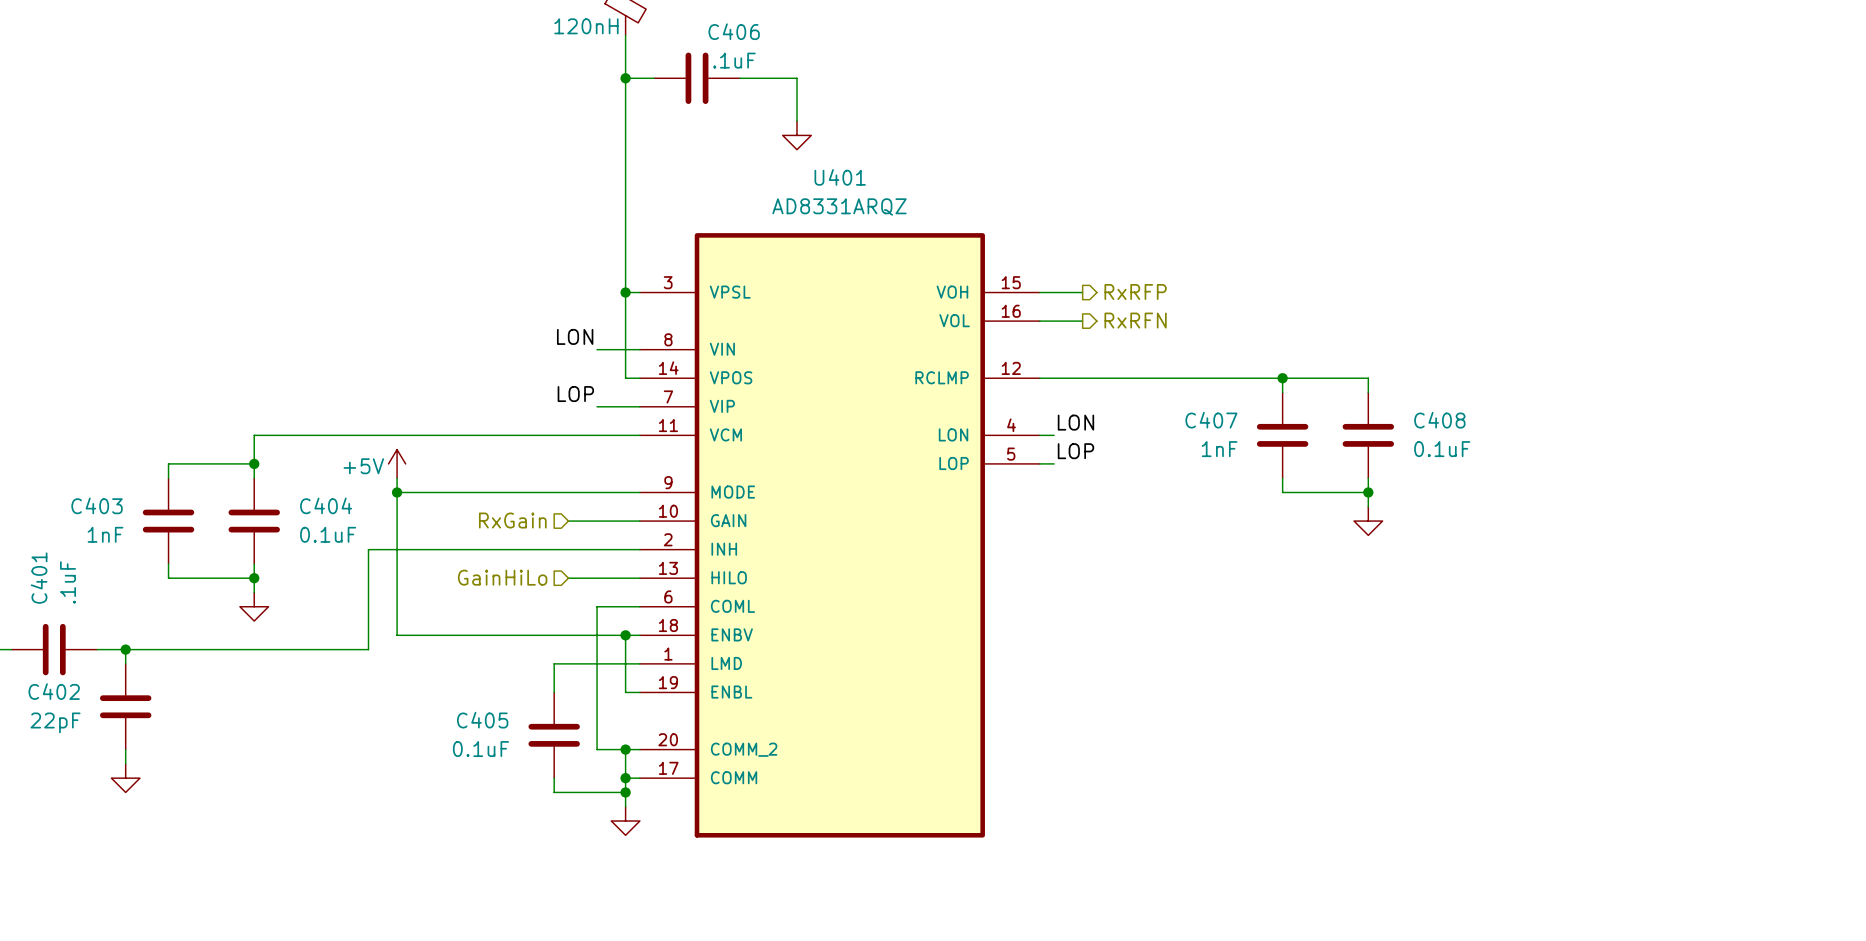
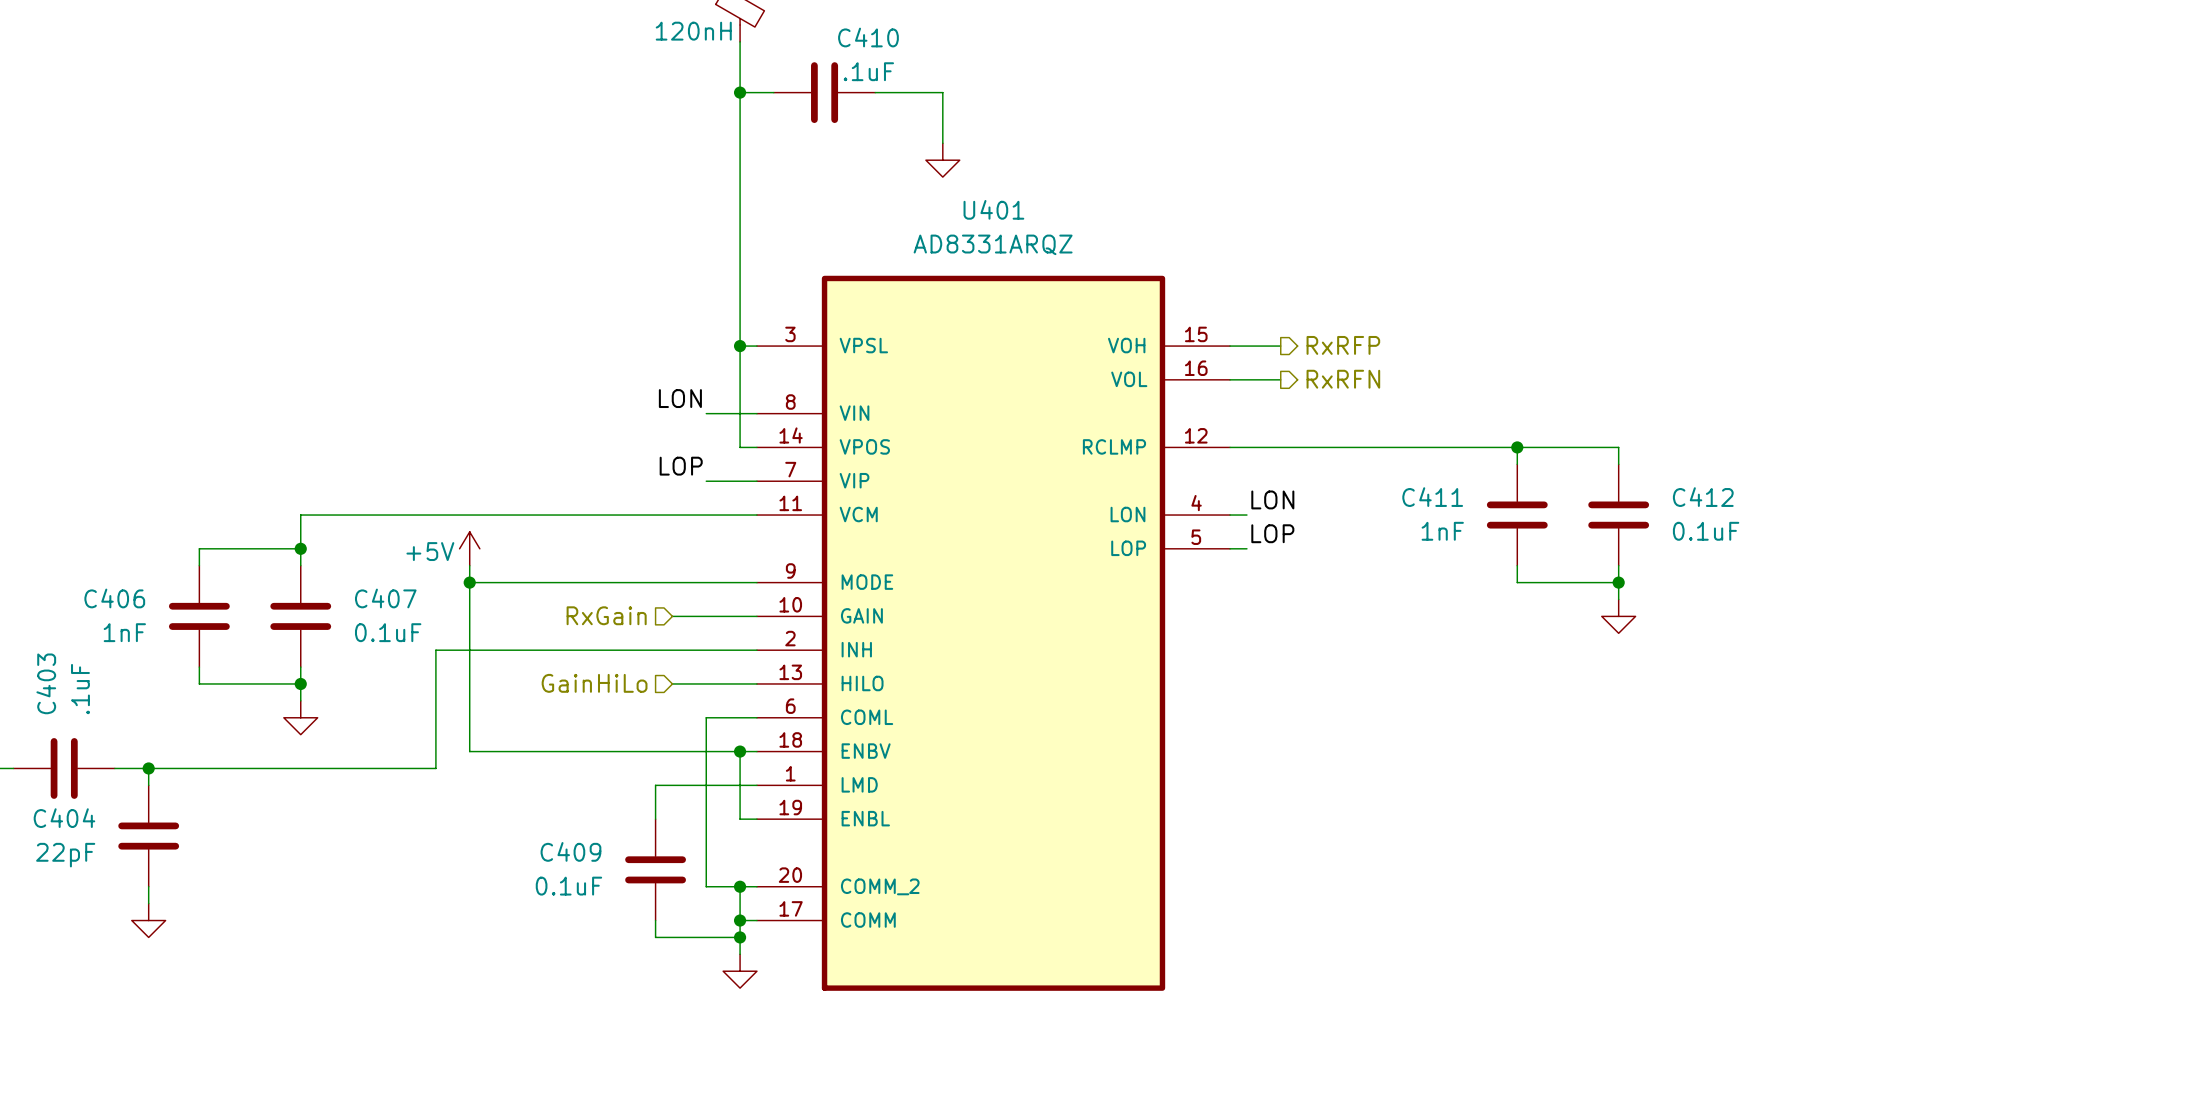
C406 name: C406 (734, 31) -> C410 (868, 37)
C407 name: C407 (1211, 420) -> C411 (1432, 497)
C408 name: C408 (1439, 420) -> C412 (1703, 497)
C403 name: C403 (97, 505) -> C406 (114, 598)
C404 name: C404 (326, 505) -> C407 (385, 598)
C401 name: C401 (39, 578) -> C403 (46, 683)
C402 name: C402 (54, 691) -> C404 (64, 818)
C405 name: C405 (482, 720) -> C409 (570, 851)

